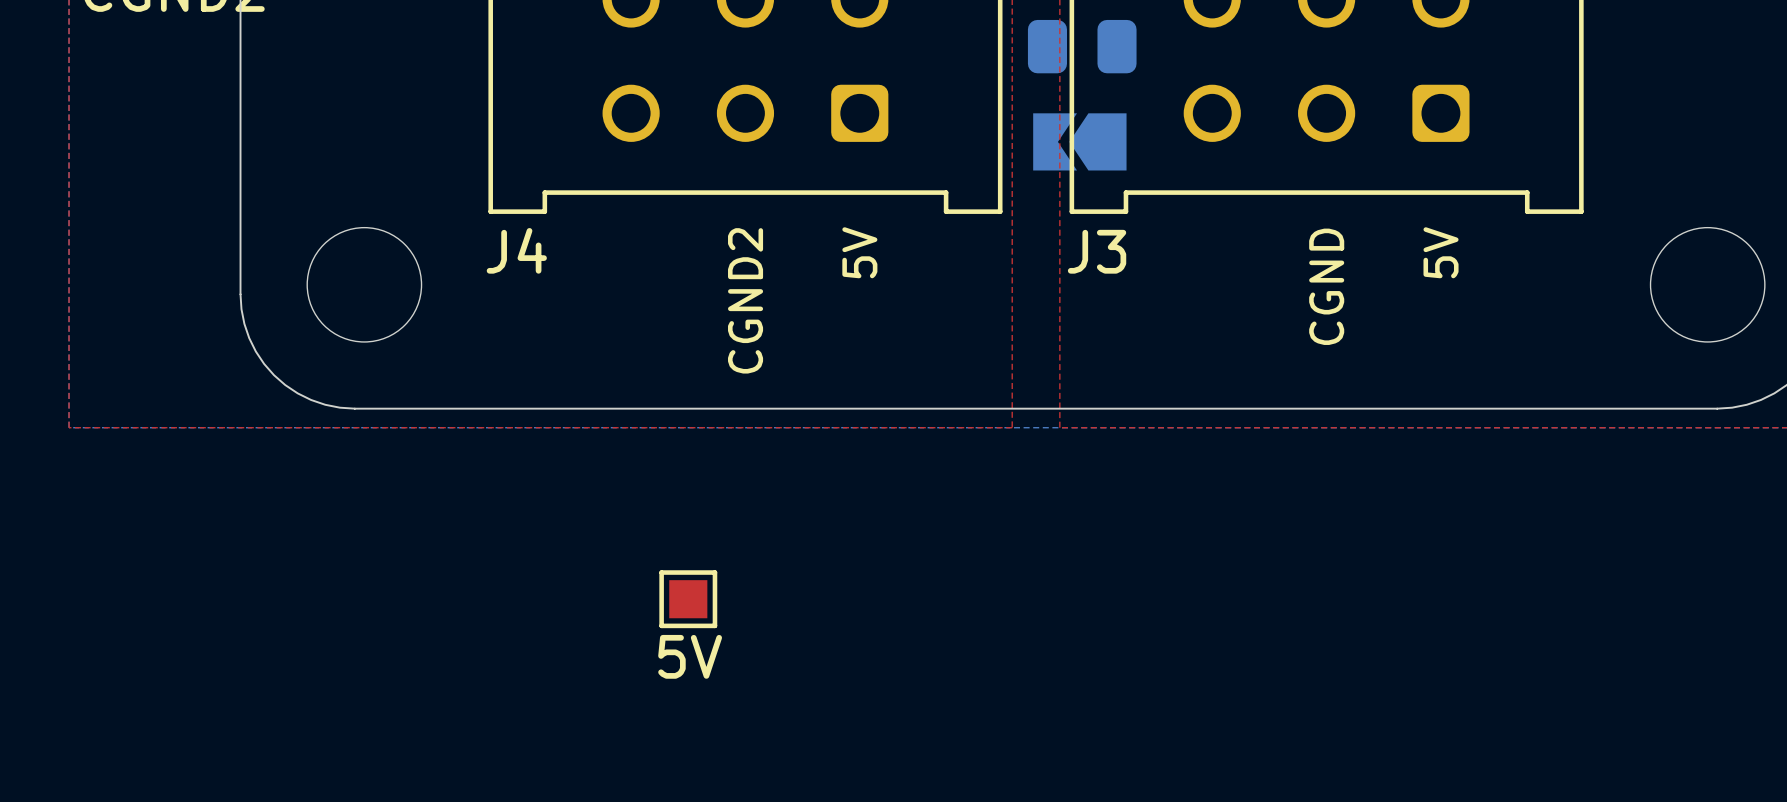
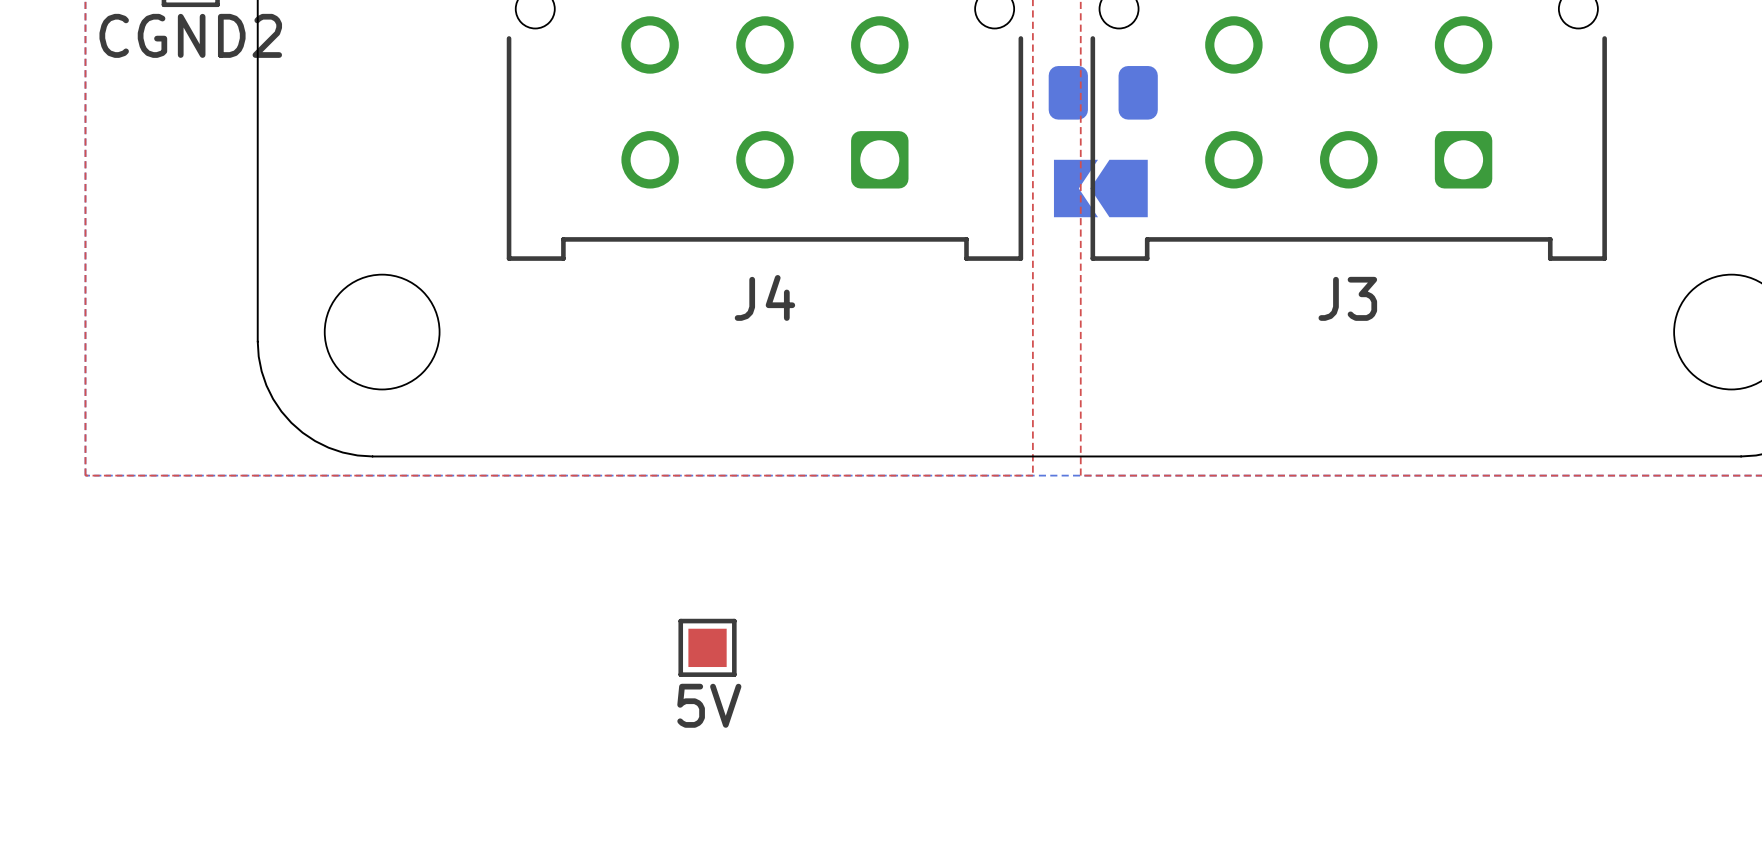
J4 name position: J4 (516, 250) -> J4 (764, 297)
J3 name position: J3 (1097, 251) -> J3 (1347, 298)
text: 5V (859, 252) -> none
text: 5V (1441, 252) -> none
text: CGND (1326, 286) -> none
text: CGND2 (745, 300) -> none

